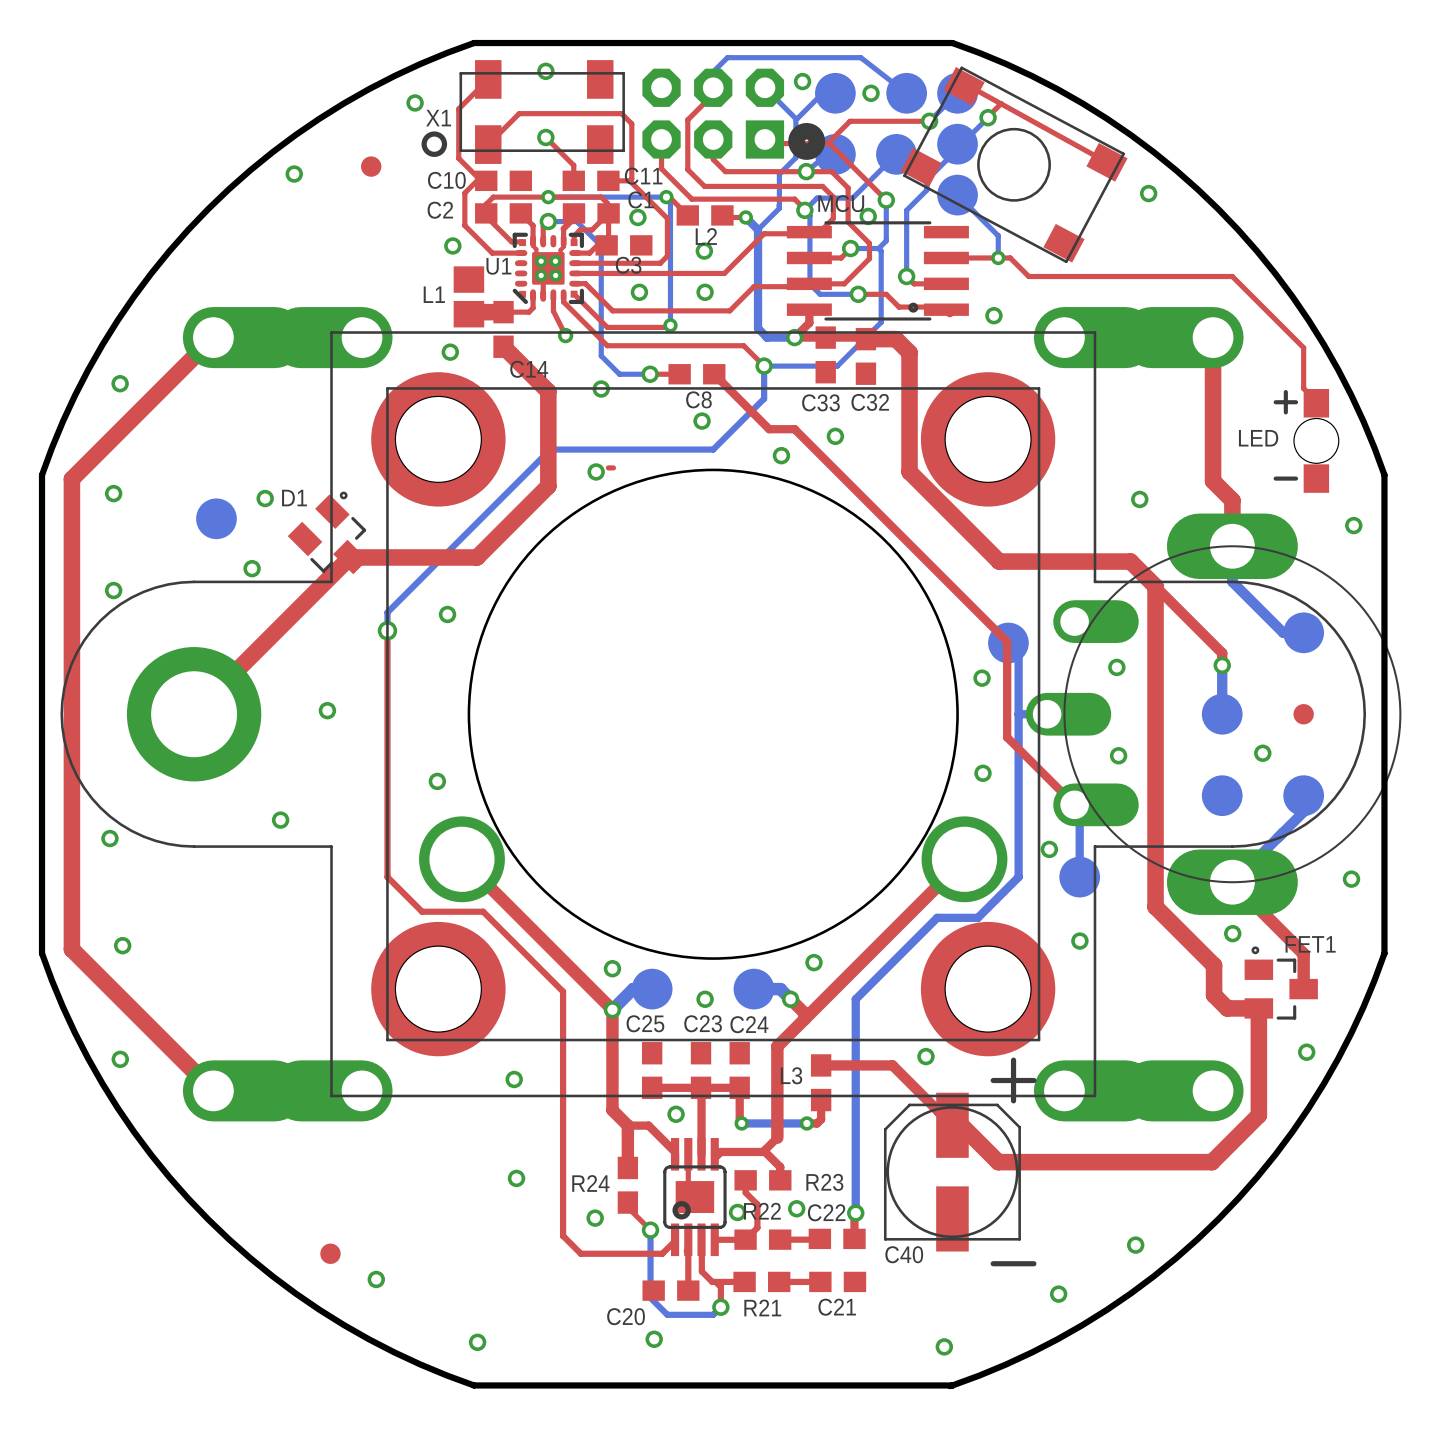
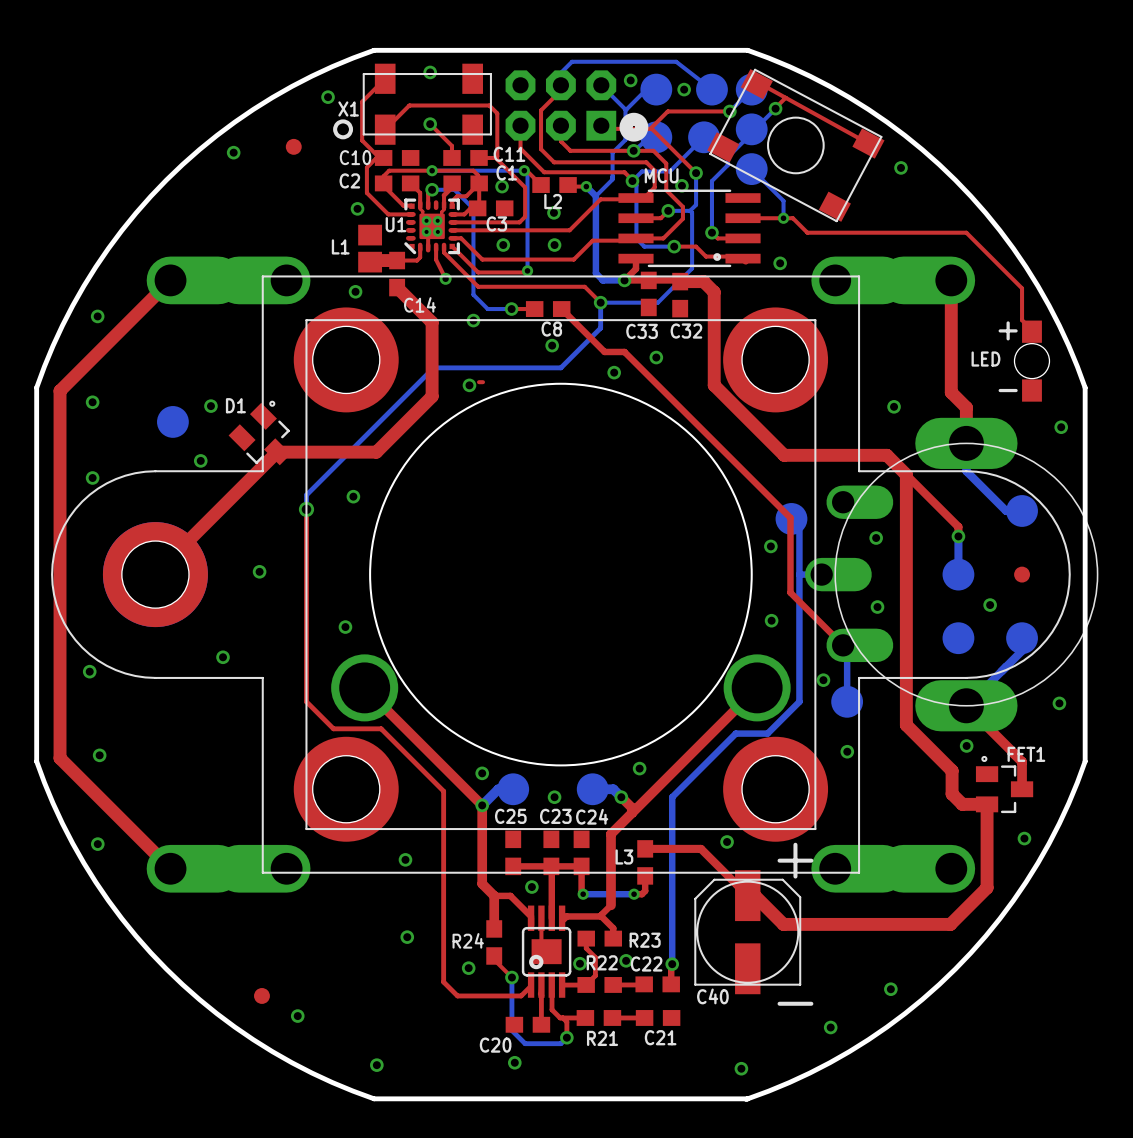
part footprint: [126, 647, 262, 782] -> [102, 522, 208, 628]

